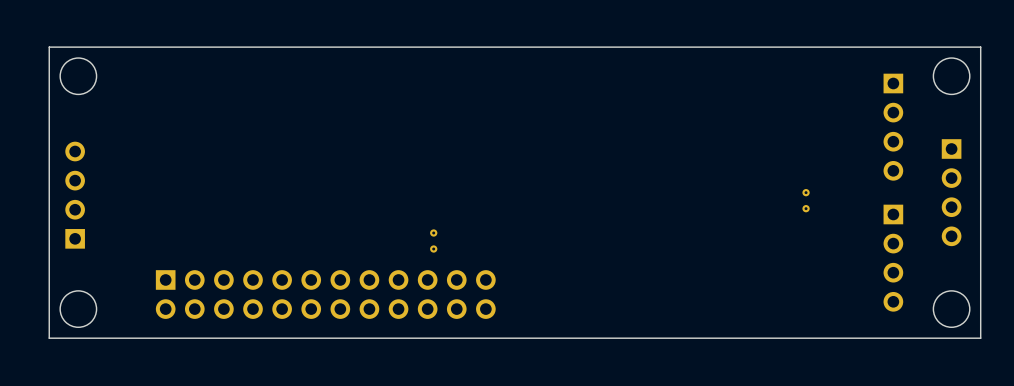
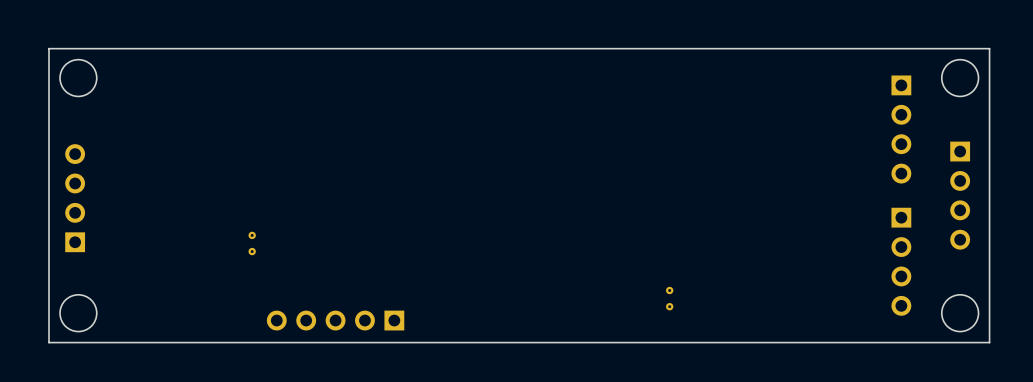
part: (806, 200) -> none
part: none -> (252, 243)
part: (433, 241) -> none
part: (325, 294) -> none
part: none -> (669, 298)
part: none -> (335, 320)

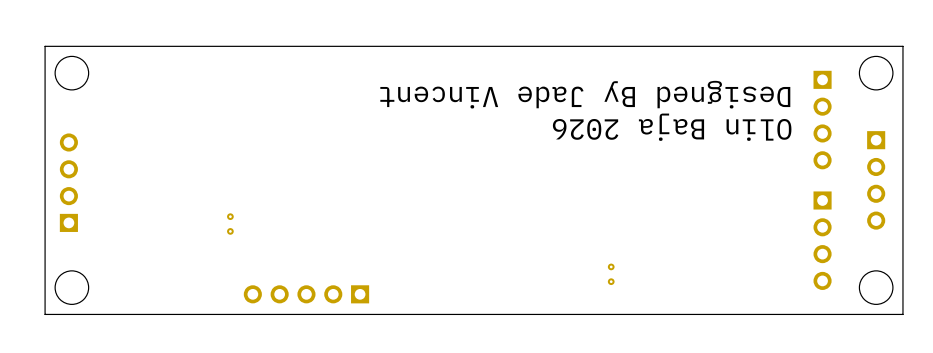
text: none -> Designed By Jade Vincent (585, 94)
text: none -> Olin Baja 2026 (672, 127)

